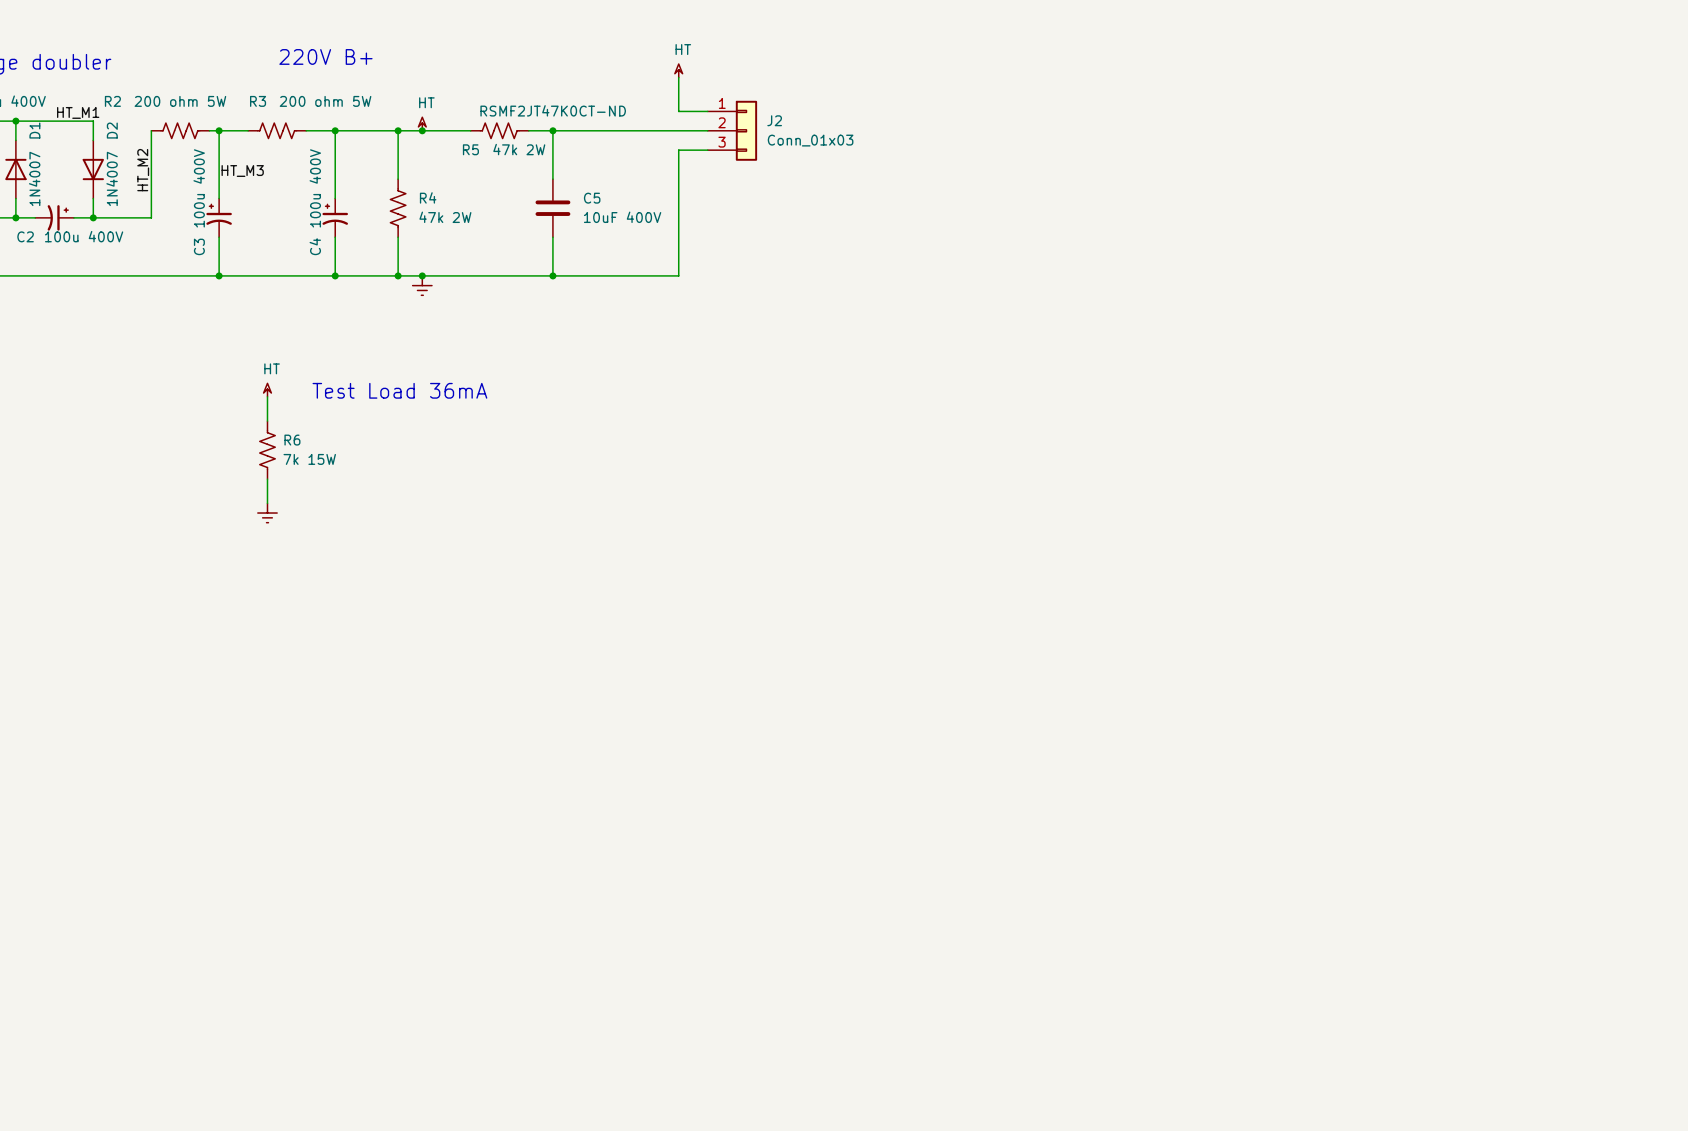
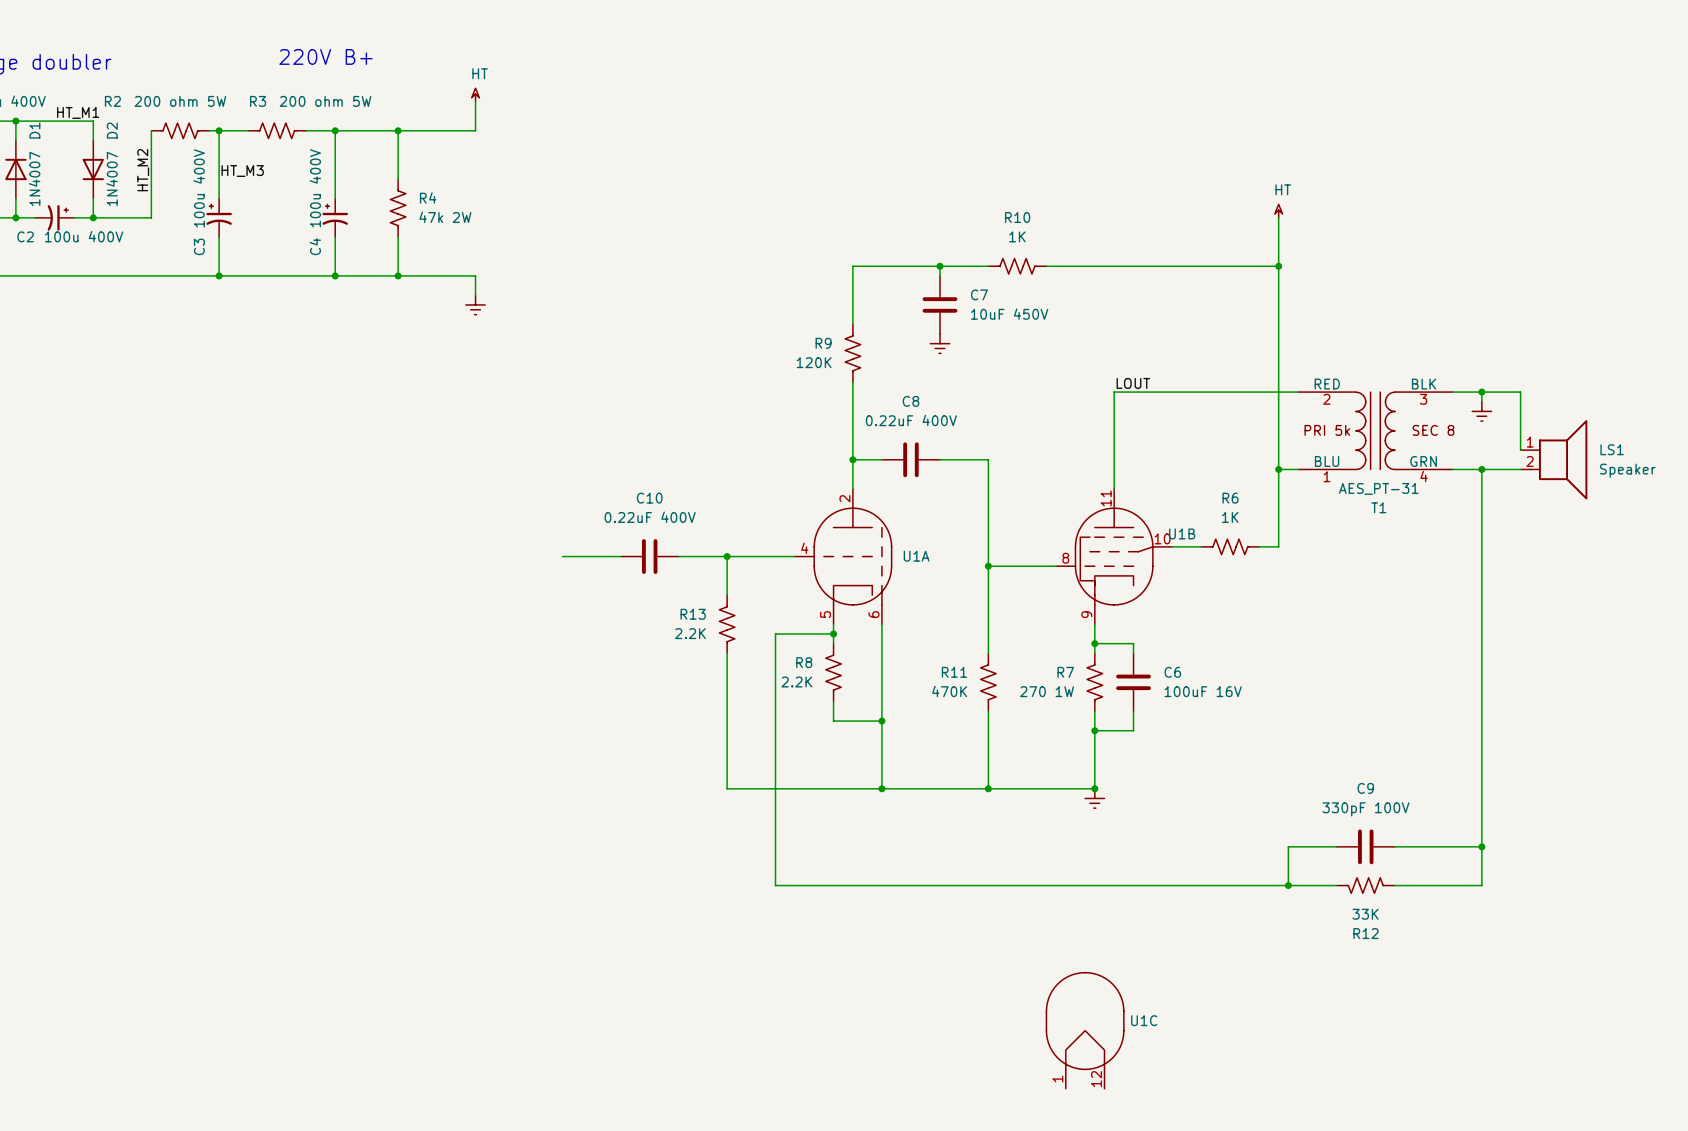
power symbol: HT (678, 70) -> none
wire: (678, 77) (678, 111) (707, 111) -> none
wire: none -> (475, 101) (475, 130) (470, 130)
power symbol position: HT (422, 124) -> HT (475, 94)
junction: (422, 130) -> none
R5: 47k 2W (499, 130) -> none
wire: (528, 130) (707, 130) -> none
wire: (552, 130) (552, 179) -> none
junction: (552, 130) -> none
J2: Conn_01x03 (732, 130) -> none
wire: (707, 150) (678, 150) (678, 275) (475, 275) -> (475, 295) (475, 275)
C5: 10uF 400V (552, 208) -> none
power symbol: none -> HT (1278, 211)
wire: none -> (1278, 217) (1278, 546) (1259, 546)
wire: (552, 237) (552, 275) -> none
wire: none -> (940, 266) (940, 275)
junction: none -> (940, 266)
wire: none -> (988, 266) (852, 266) (852, 324)
R10: none -> 1K (1017, 266)
wire: none -> (1046, 266) (1278, 266)
junction: none -> (1278, 266)
junction: (422, 275) -> none
junction: (552, 275) -> none
power symbol position: (422, 285) -> (475, 304)
C7: none -> 10uF 450V (940, 304)
power symbol: none -> (940, 343)
R9: none -> 120K (852, 353)
wire: none -> (852, 382) (852, 488)
label: none -> LOUT (1133, 383)
power symbol: HT (267, 390) -> none
text: Test Load 36mA (399, 390) -> none
wire: none -> (1298, 392) (1114, 392) (1114, 488)
wire: none -> (1452, 392) (1520, 392) (1520, 450)
wire: none -> (1481, 392) (1481, 401)
junction: none -> (1481, 392)
wire: (267, 396) (267, 421) -> none
power symbol: none -> (1481, 411)
T1: none -> AES_PT-31 (1375, 430)
R6 name position: R6 (292, 440) -> R6 (1230, 498)
R6 rotation: 0° (267, 450) -> 90° clockwise (1230, 546)
R6 position: (267, 450) -> (1230, 546)
R6 value: 7k 15W (309, 459) -> 1K (1230, 517)
wire: none -> (852, 459) (881, 459)
junction: none -> (852, 459)
C8: none -> 0.22uF 400V (910, 459)
wire: none -> (940, 459) (988, 459) (988, 653)
LS1: none -> Speaker (1553, 459)
wire: none -> (1278, 469) (1298, 469)
junction: none -> (1278, 469)
wire: none -> (1452, 469) (1520, 469)
wire: none -> (1481, 469) (1481, 885) (1394, 885)
junction: none -> (1481, 469)
wire: (267, 479) (267, 503) -> none
power symbol: (267, 513) -> none
wire: none -> (1172, 546) (1201, 546)
wire: none -> (562, 556) (620, 556)
C10: none -> 0.22uF 400V (649, 556)
wire: none -> (678, 556) (794, 556)
wire: none -> (727, 556) (727, 595)
junction: none -> (727, 556)
U1A: none -> (843, 556)
U1B: none -> (1114, 556)
wire: none -> (988, 566) (1056, 566)
junction: none -> (988, 566)
R13: none -> 2.2K (727, 624)
wire: none -> (833, 624) (833, 643)
wire: none -> (881, 624) (881, 788)
wire: none -> (1094, 624) (1094, 653)
wire: none -> (833, 633) (775, 633) (775, 885) (1336, 885)
junction: none -> (833, 633)
wire: none -> (1094, 643) (1133, 643) (1133, 653)
junction: none -> (1094, 643)
wire: none -> (727, 653) (727, 788) (1094, 788) (1094, 711)
R8: none -> 2.2K (833, 672)
R11: none -> 470K (988, 682)
R7: none -> 270 1W (1094, 682)
C6: none -> 100uF 16V (1133, 682)
wire: none -> (833, 701) (833, 721) (881, 721)
wire: none -> (988, 711) (988, 788)
wire: none -> (1133, 711) (1133, 730) (1094, 730)
junction: none -> (881, 721)
junction: none -> (1094, 730)
junction: none -> (881, 788)
junction: none -> (988, 788)
junction: none -> (1094, 788)
power symbol: none -> (1094, 798)
wire: none -> (1336, 846) (1288, 846) (1288, 885)
C9: none -> 330pF 100V (1365, 846)
wire: none -> (1394, 846) (1481, 846)
junction: none -> (1481, 846)
junction: none -> (1288, 885)
R12: none -> 33K (1365, 885)
U1C: none -> (1085, 1030)

